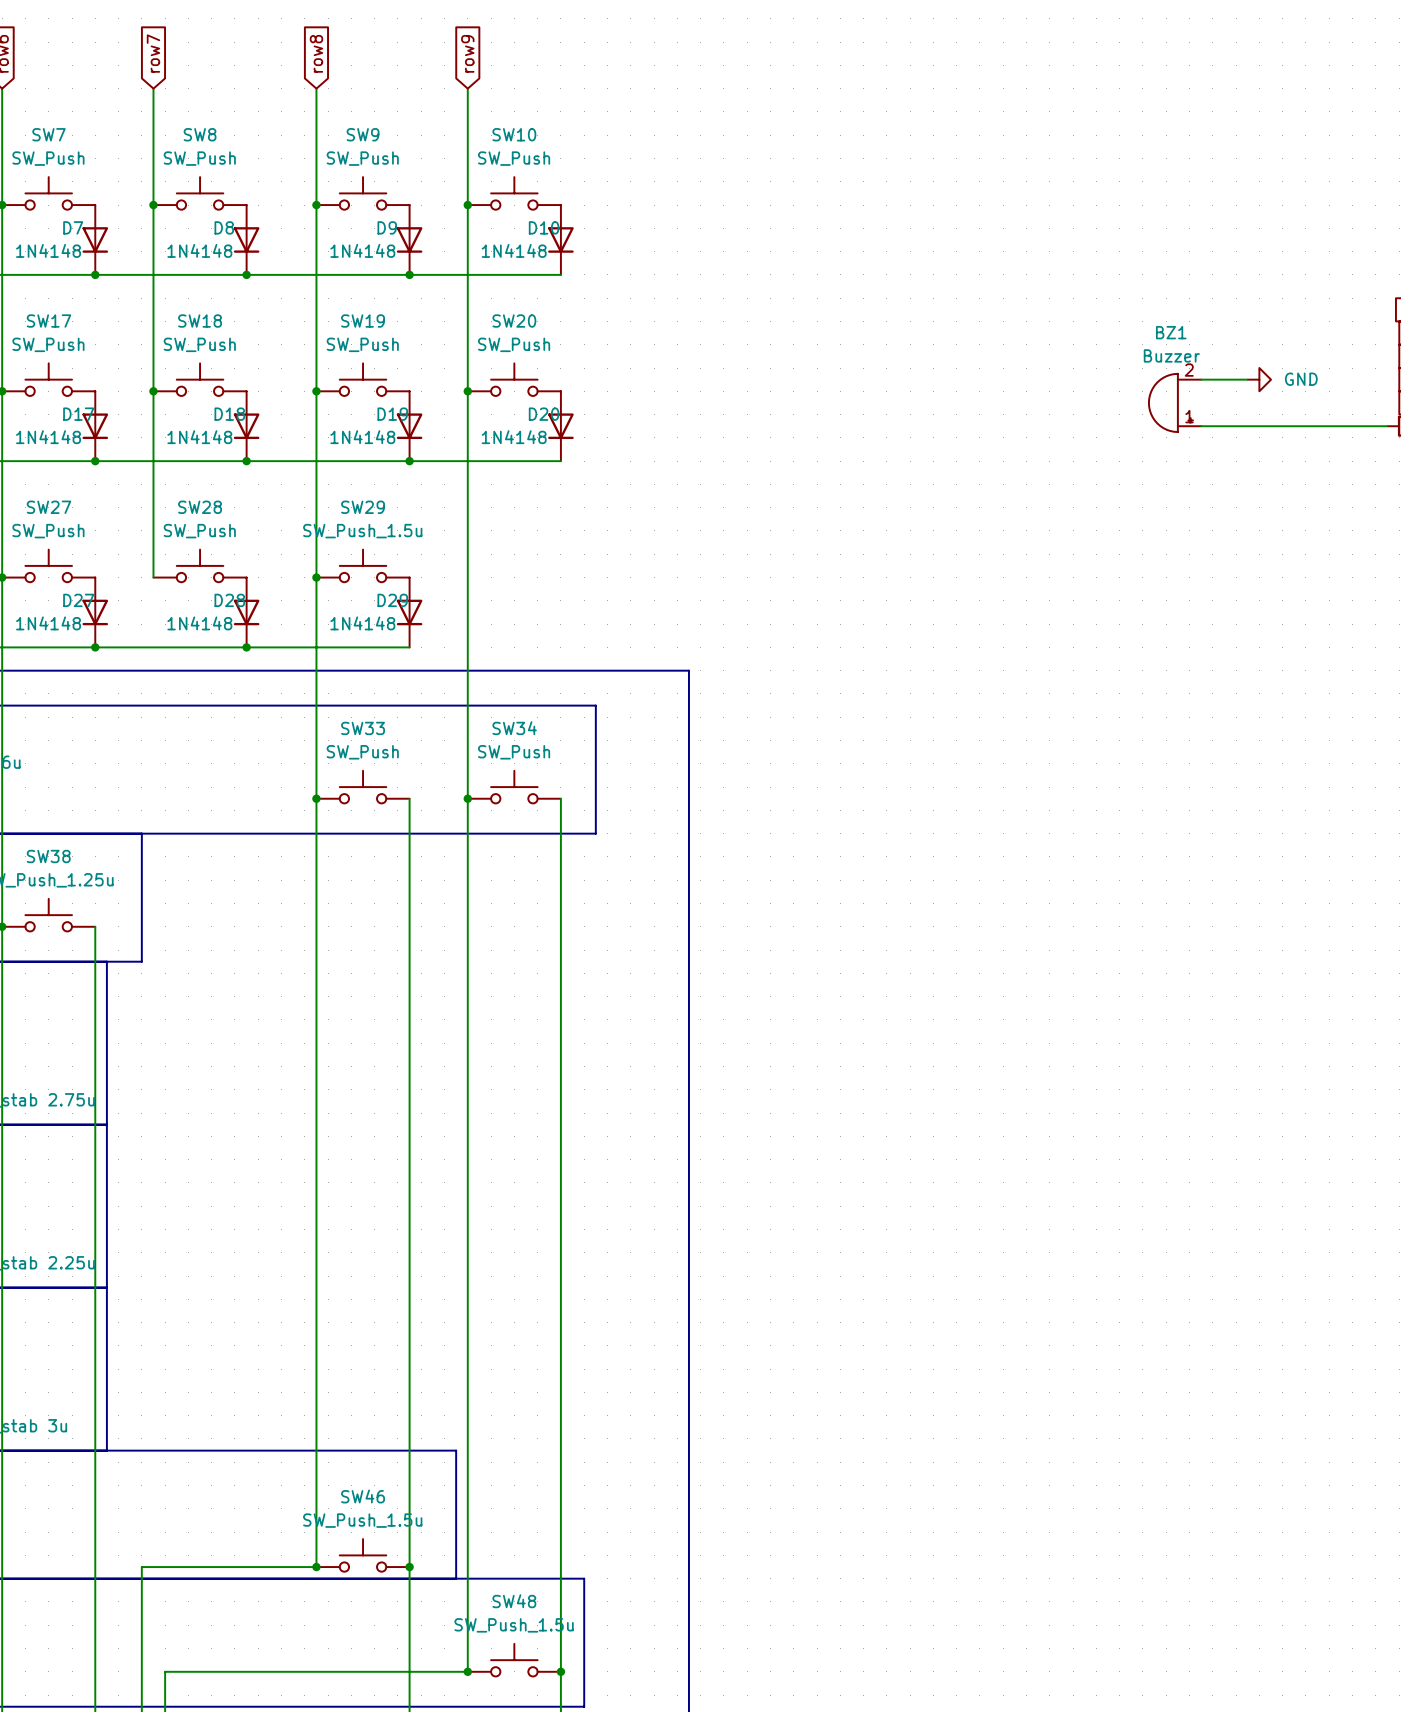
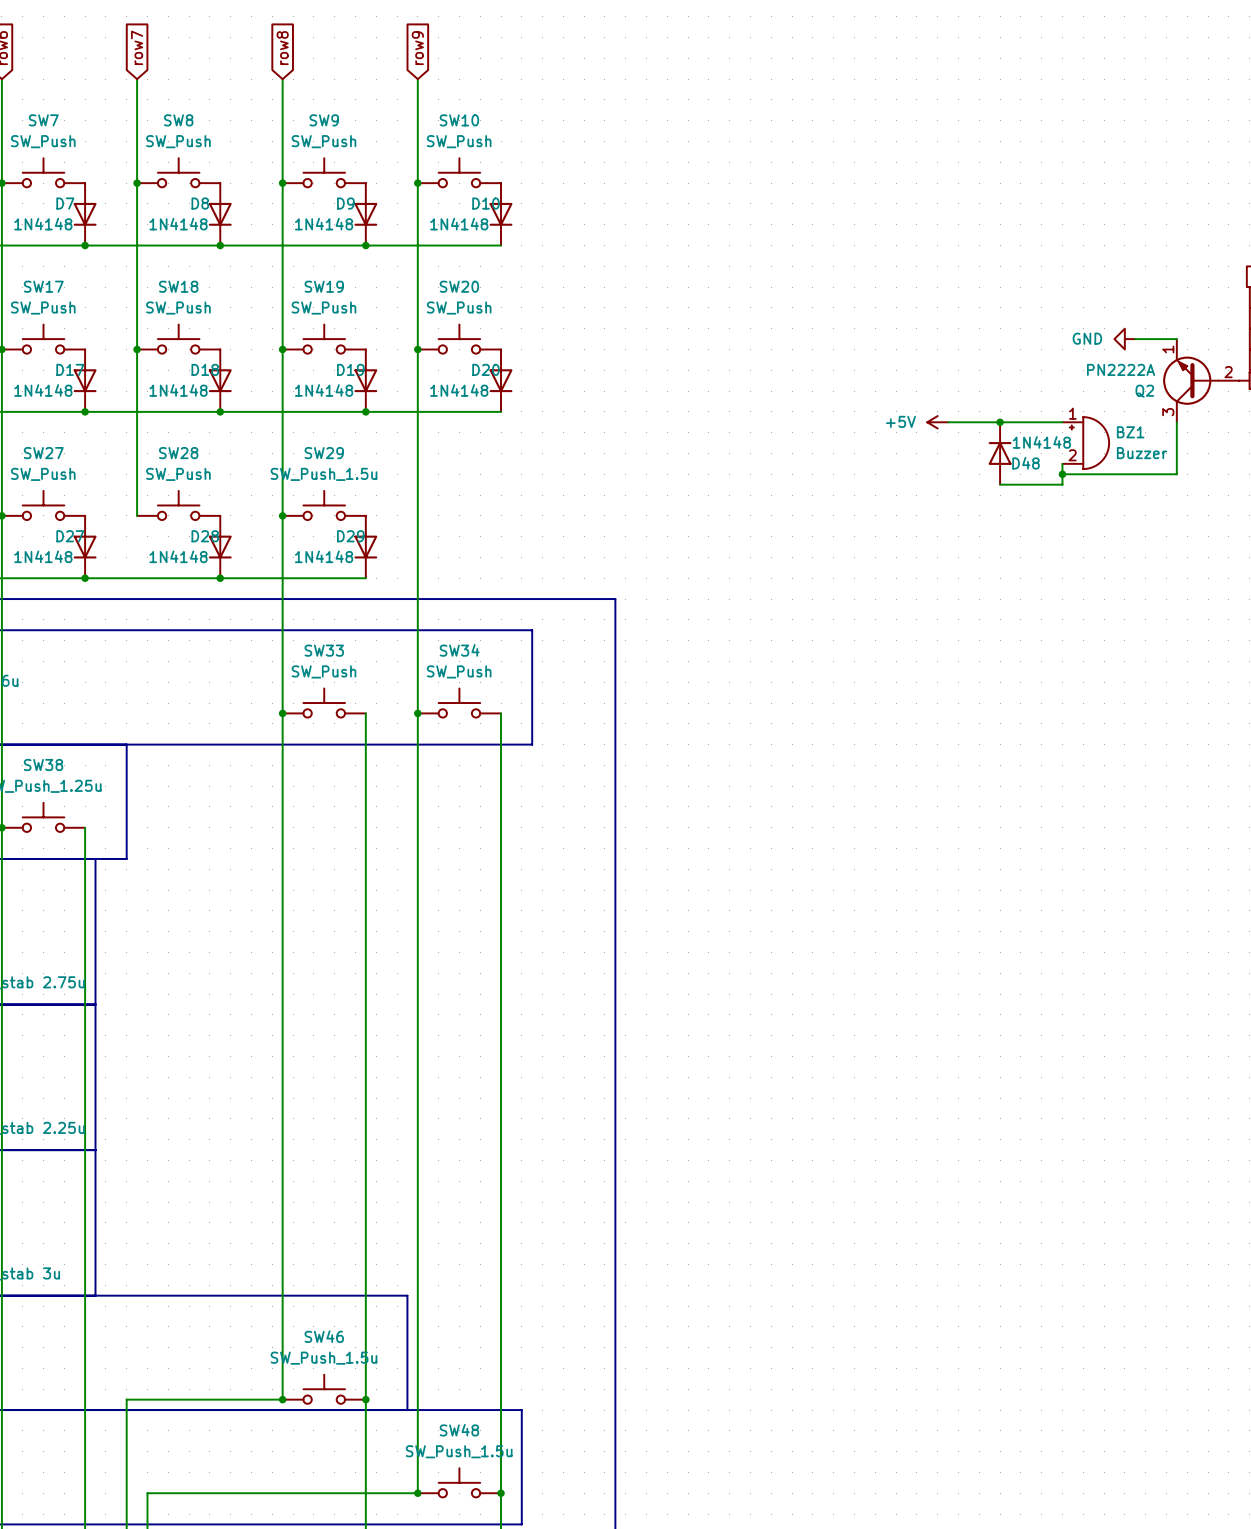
BZ1 name position: BZ1 (1171, 332) -> BZ1 (1130, 432)
BZ1 value position: Buzzer (1171, 355) -> Buzzer (1142, 453)
wire: (1201, 379) (1247, 379) -> (1135, 339) (1176, 339)
power symbol rotation: 0° (1259, 379) -> 180° (1124, 339)
BZ1 rotation: 0° (1170, 402) -> 180° (1089, 443)
BZ1 position: (1175, 402) -> (1085, 443)
wire: (1201, 426) (1387, 426) -> none
Q2: none -> PN2222A (1201, 380)
power symbol: none -> +5V (937, 422)
wire: none -> (948, 422) (1062, 422)
junction: none -> (1000, 422)
wire: none -> (1176, 422) (1176, 474) (1062, 474)
D48: none -> 1N4148 (1000, 453)
wire: none -> (1062, 463) (1062, 484) (1000, 484)
junction: none -> (1062, 474)

